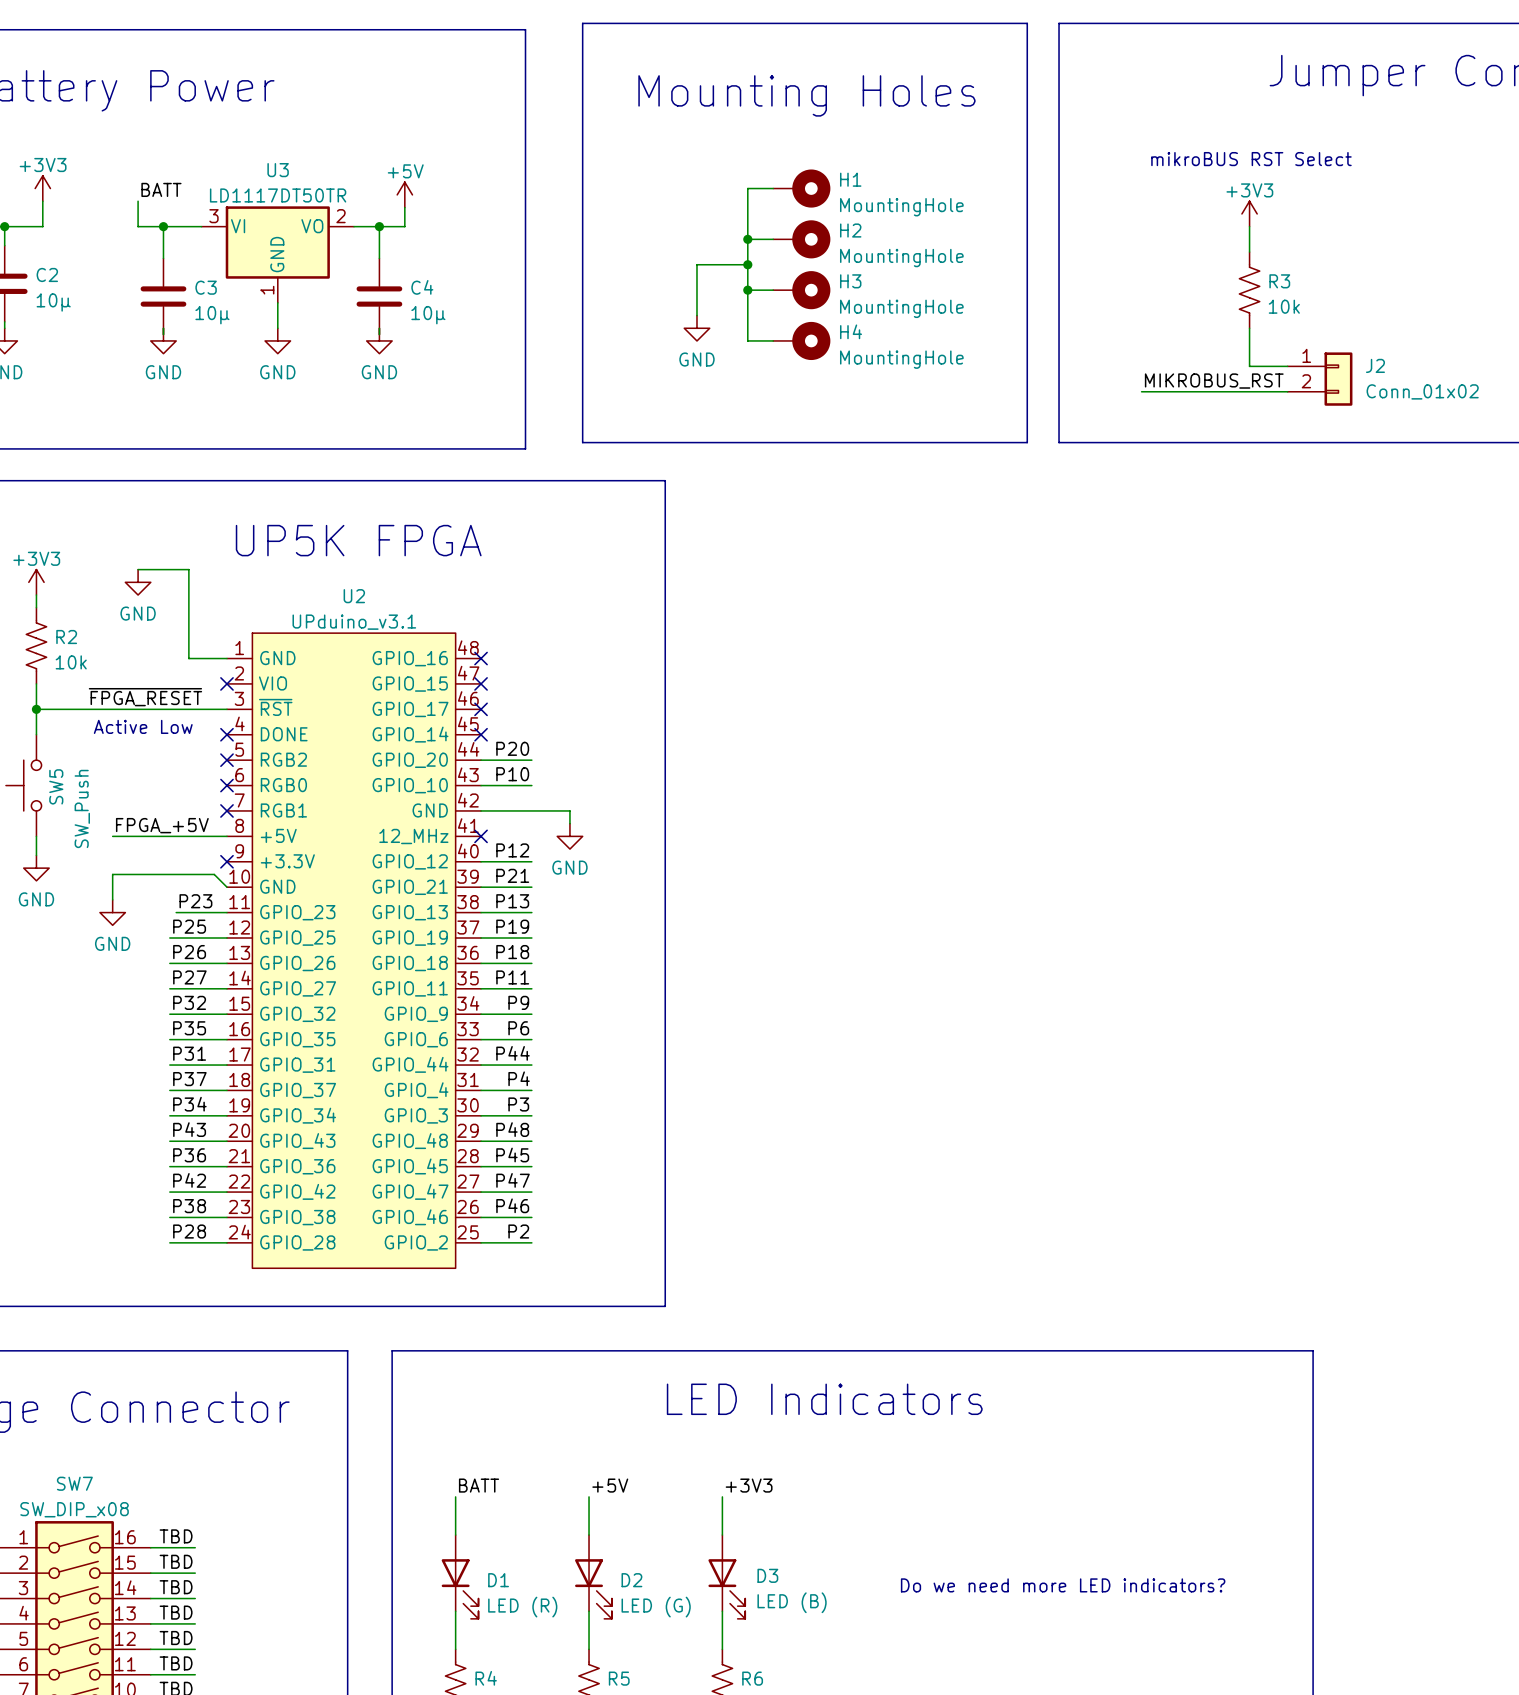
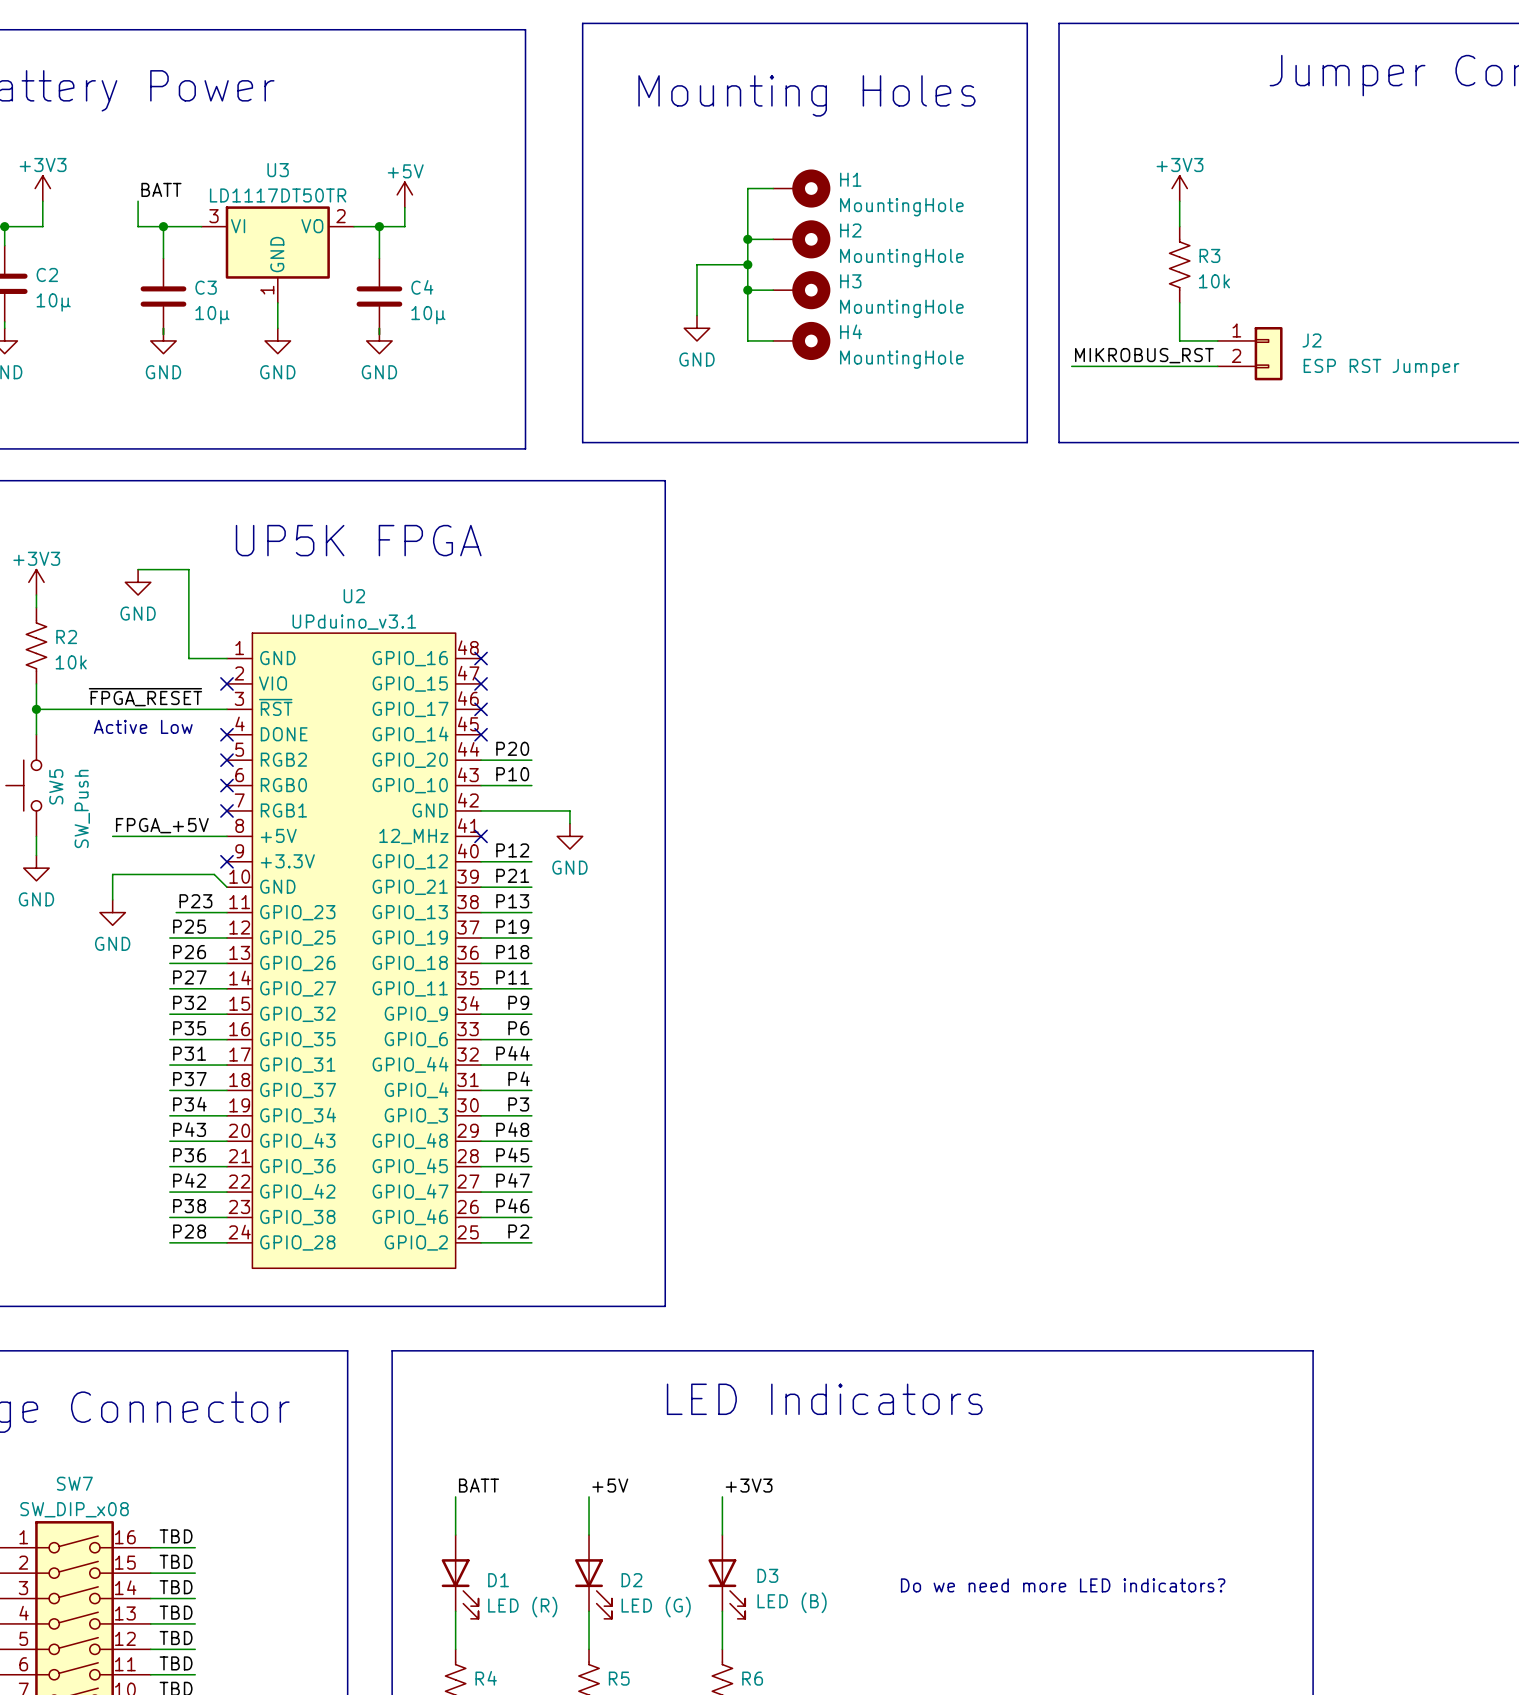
text: mikroBUS RST Select (1251, 159) -> none
power symbol position: +3V3 (1249, 213) -> +3V3 (1179, 188)
wire: (1249, 226) (1249, 252) -> (1179, 201) (1179, 226)
R3 position: (1249, 290) -> (1179, 264)
wire: (1249, 328) (1249, 366) (1287, 366) -> (1179, 302) (1179, 340) (1217, 340)
J2 name position: J2 (1375, 365) -> J2 (1311, 340)
J2 position: (1320, 379) -> (1250, 353)
label position: MIKROBUS_RST (1214, 381) -> MIKROBUS_RST (1144, 355)
wire: (1141, 391) (1287, 391) -> (1071, 366) (1217, 366)
J2 value: Conn_01x02 (1422, 391) -> ESP RST Jumper (1381, 368)

